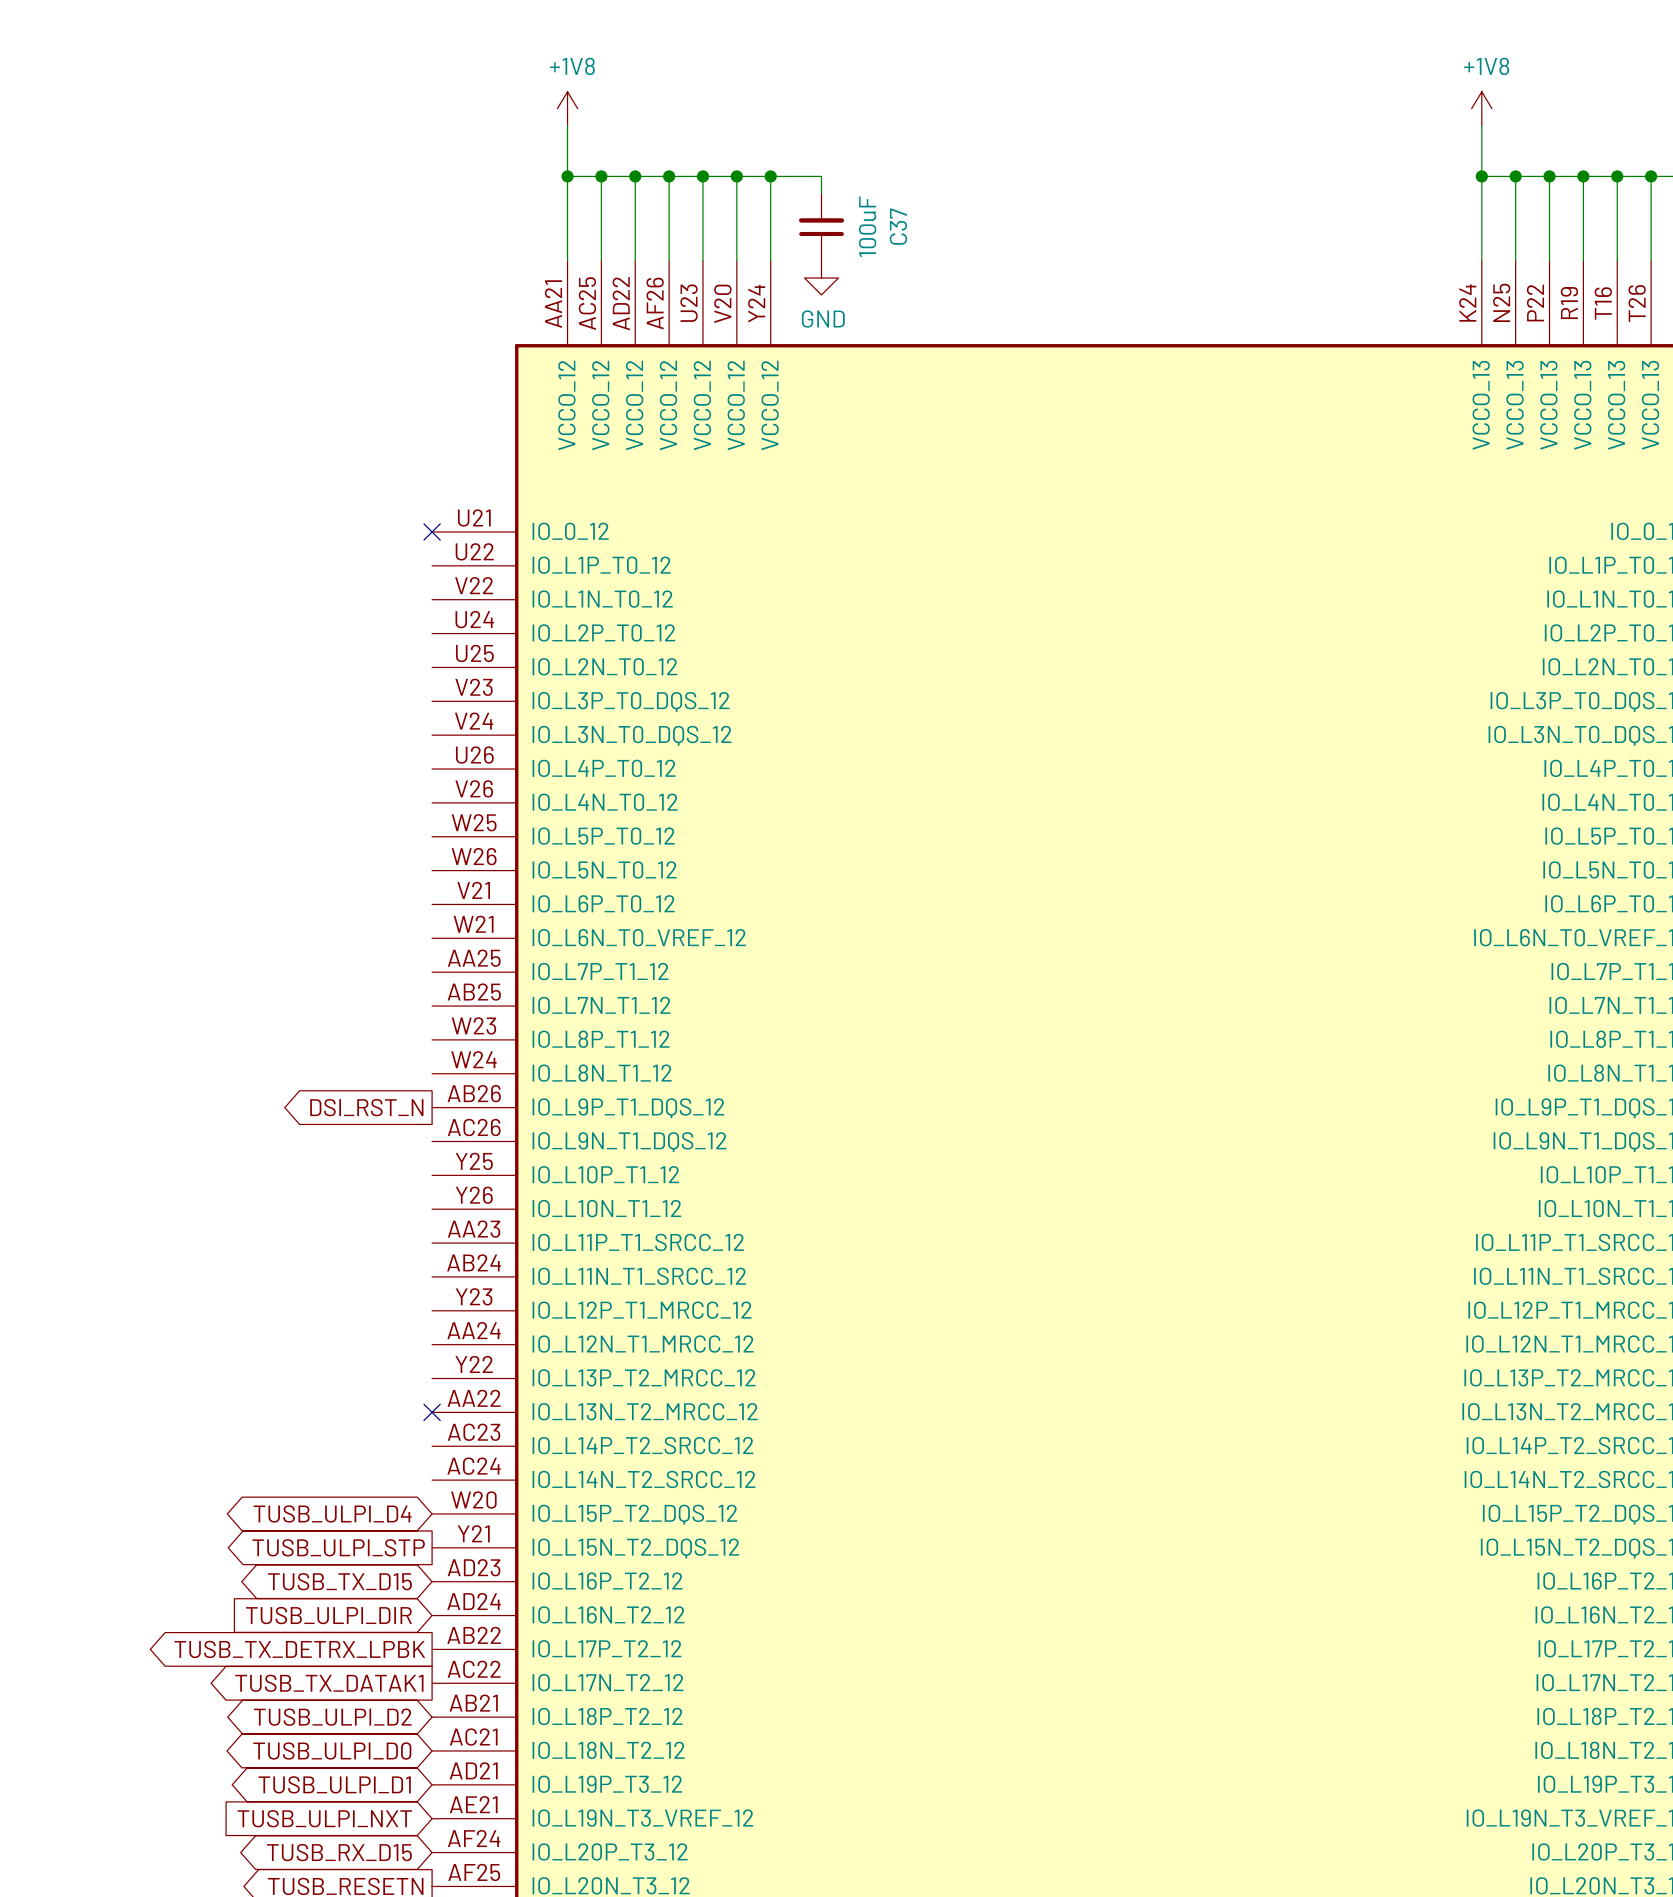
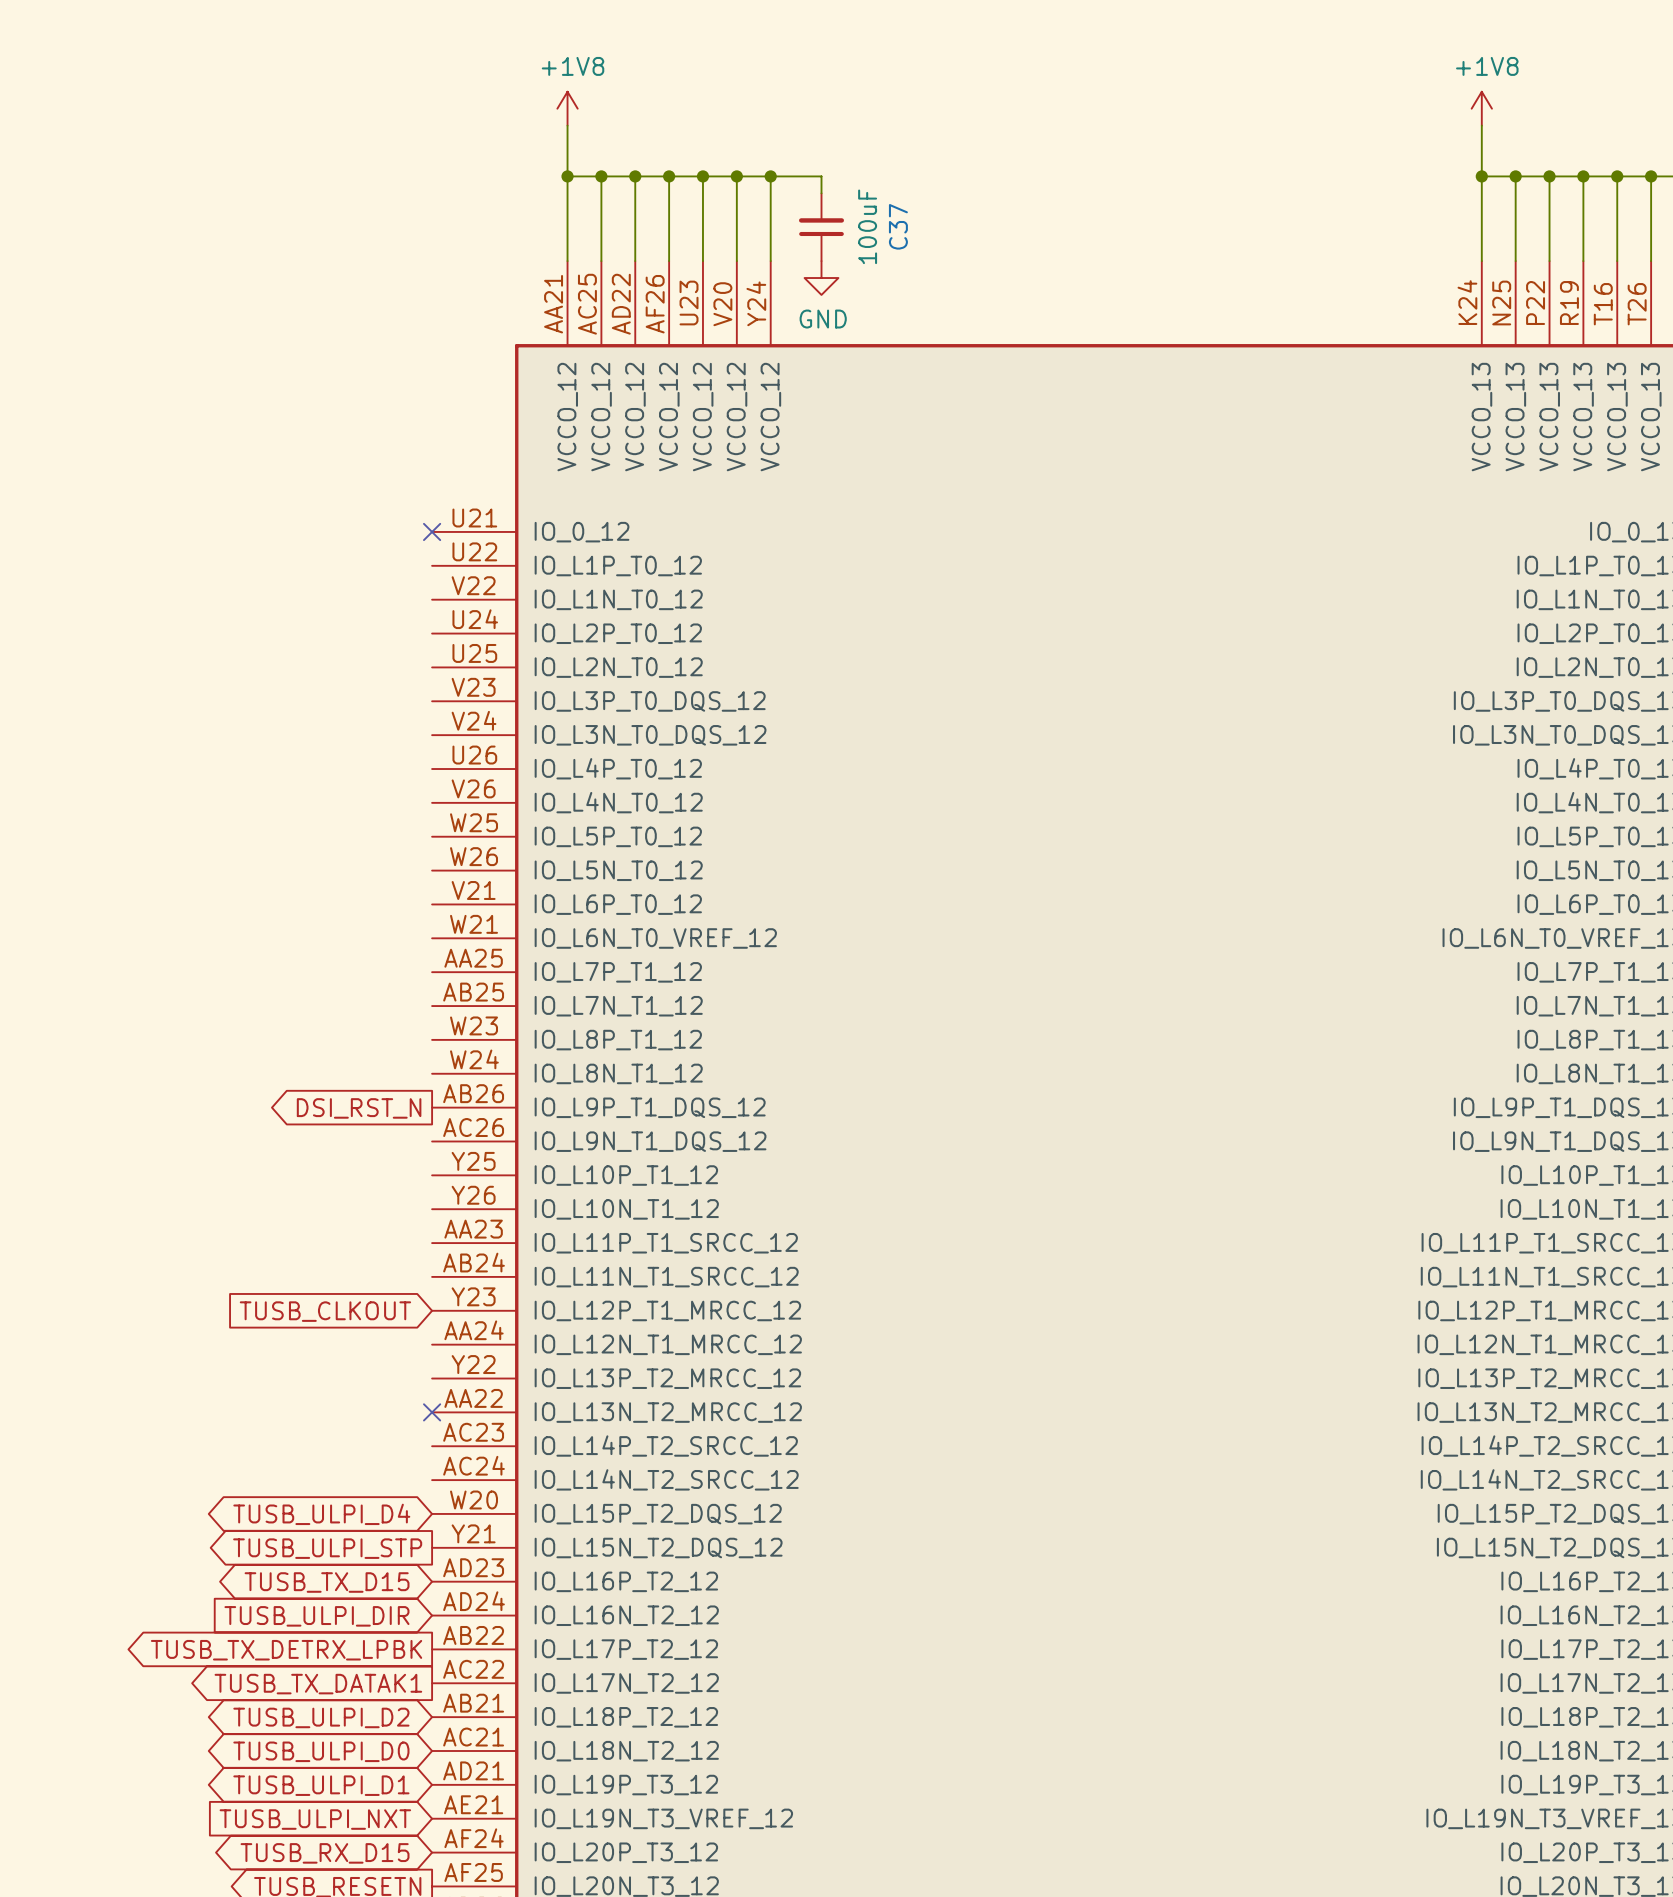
global label: none -> TUSB_CLKOUT (325, 1311)

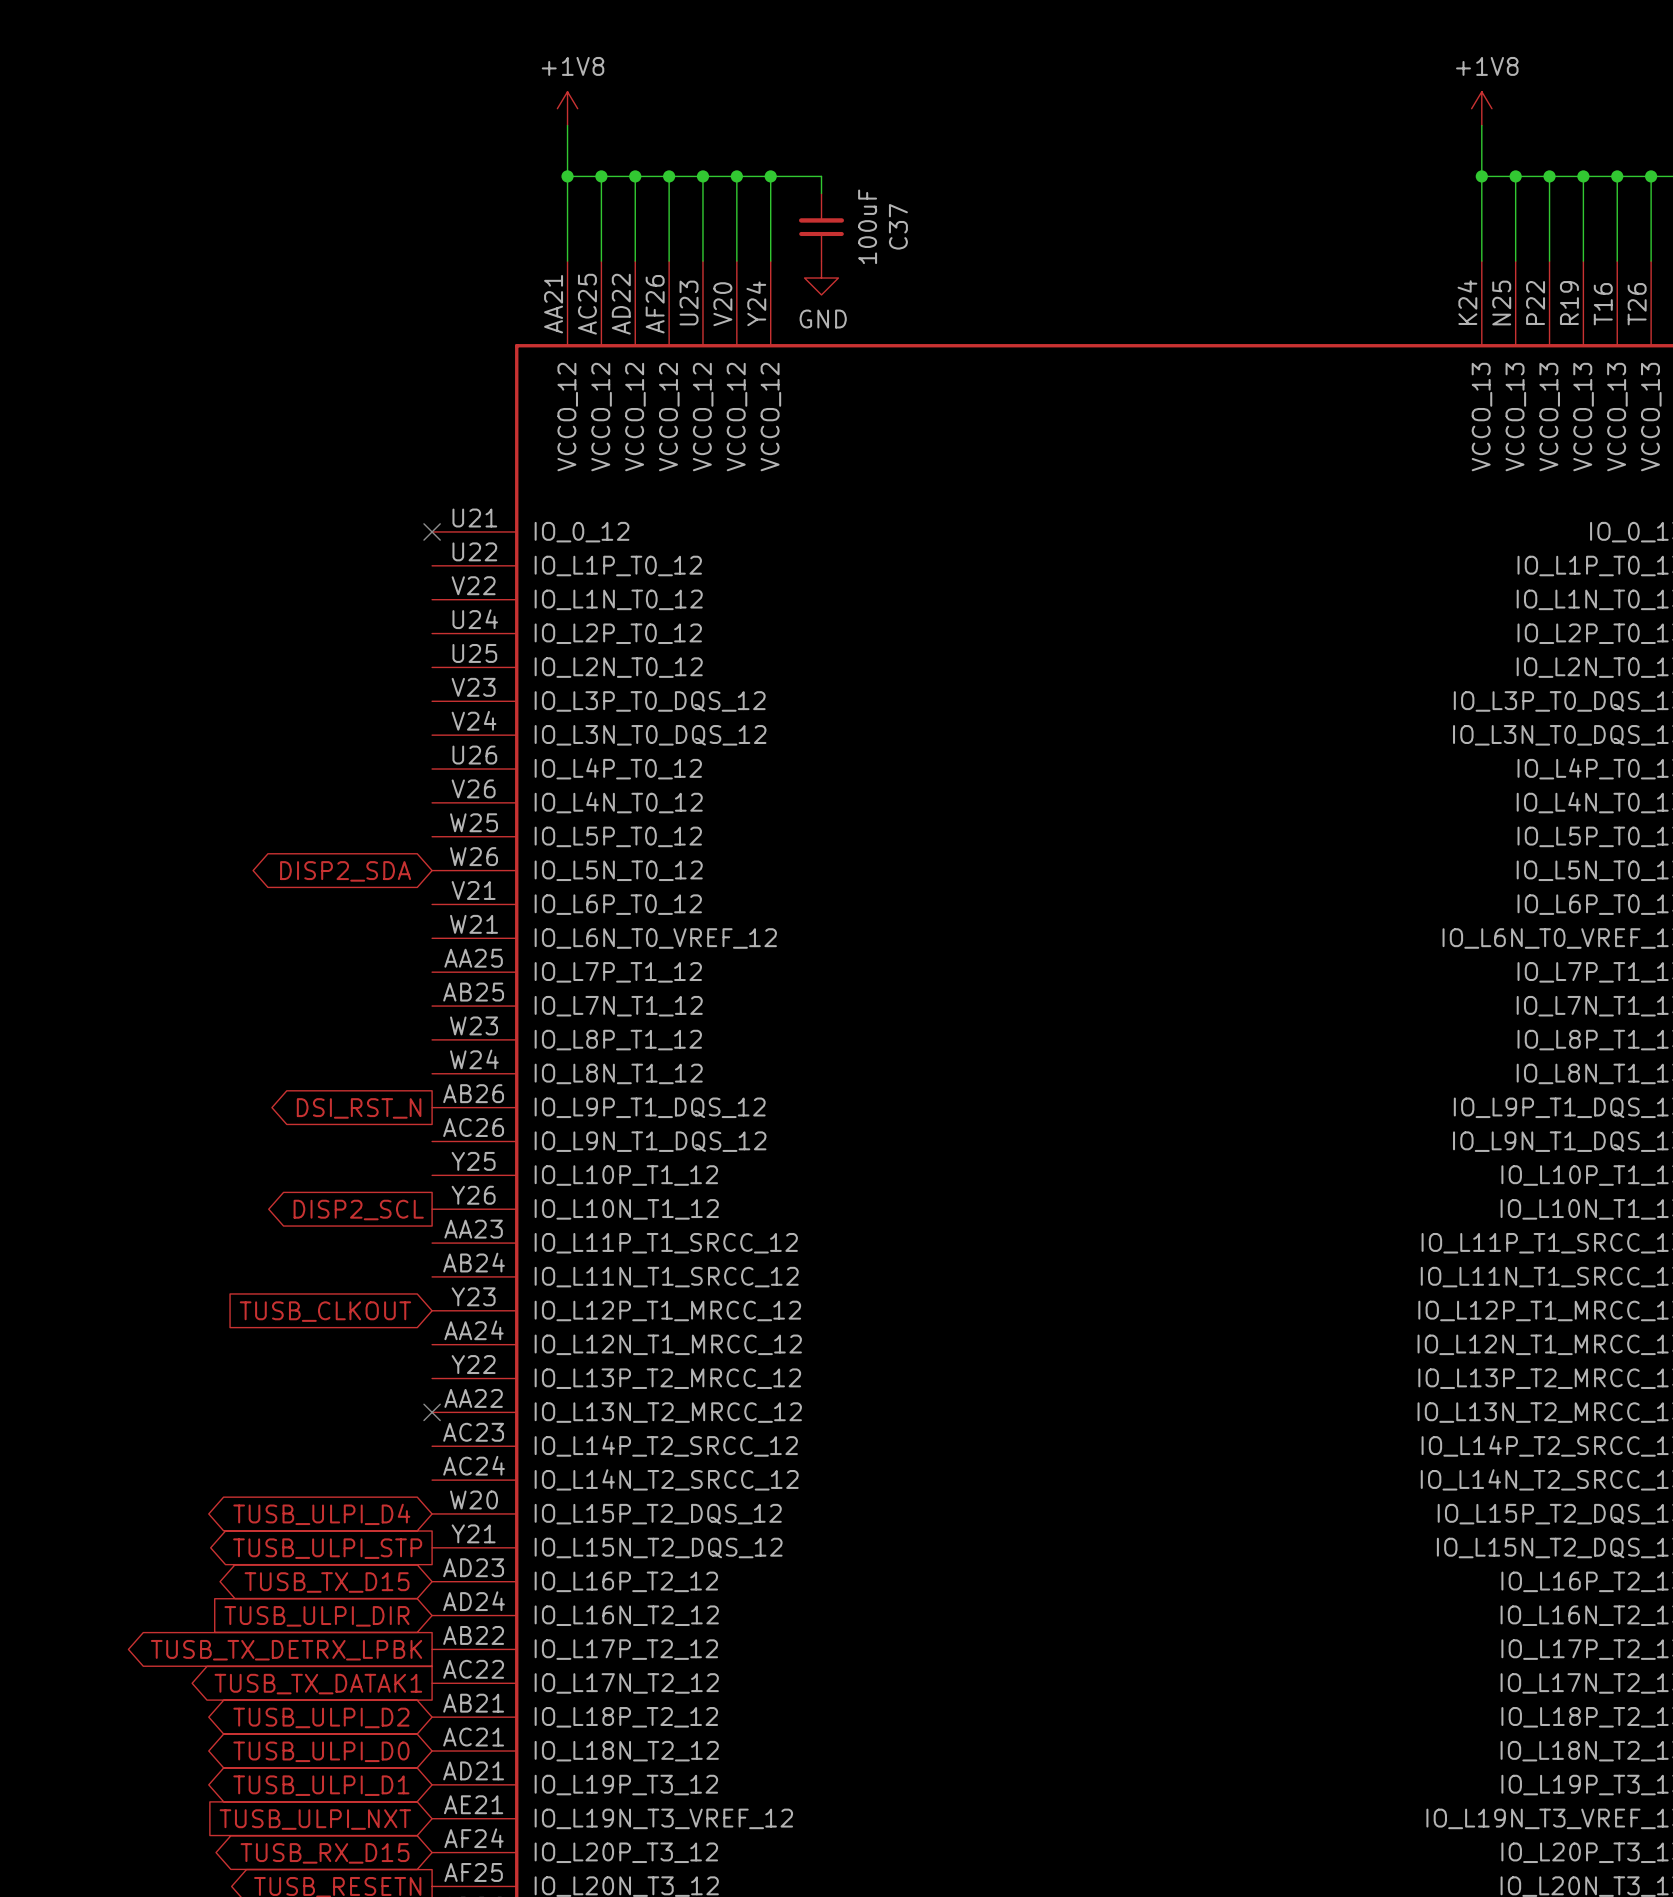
global label: none -> DISP2_SDA (345, 871)
global label: none -> DISP2_SCL (358, 1210)

